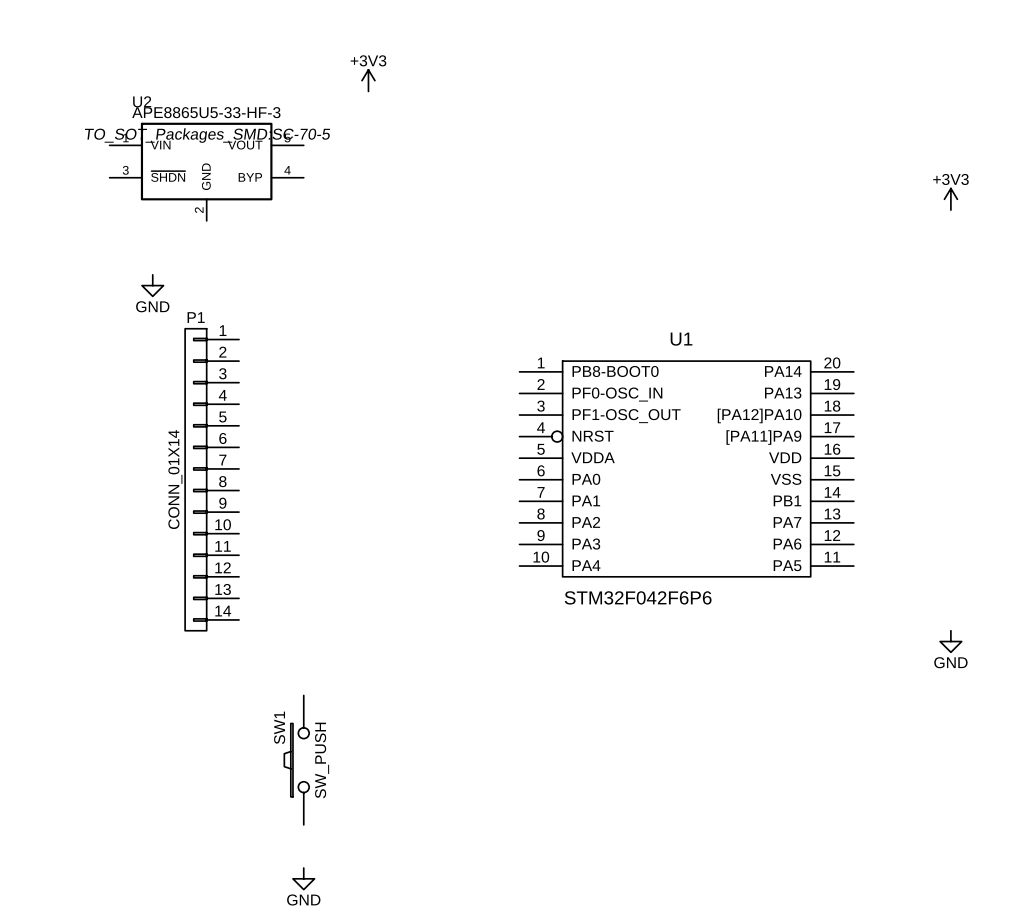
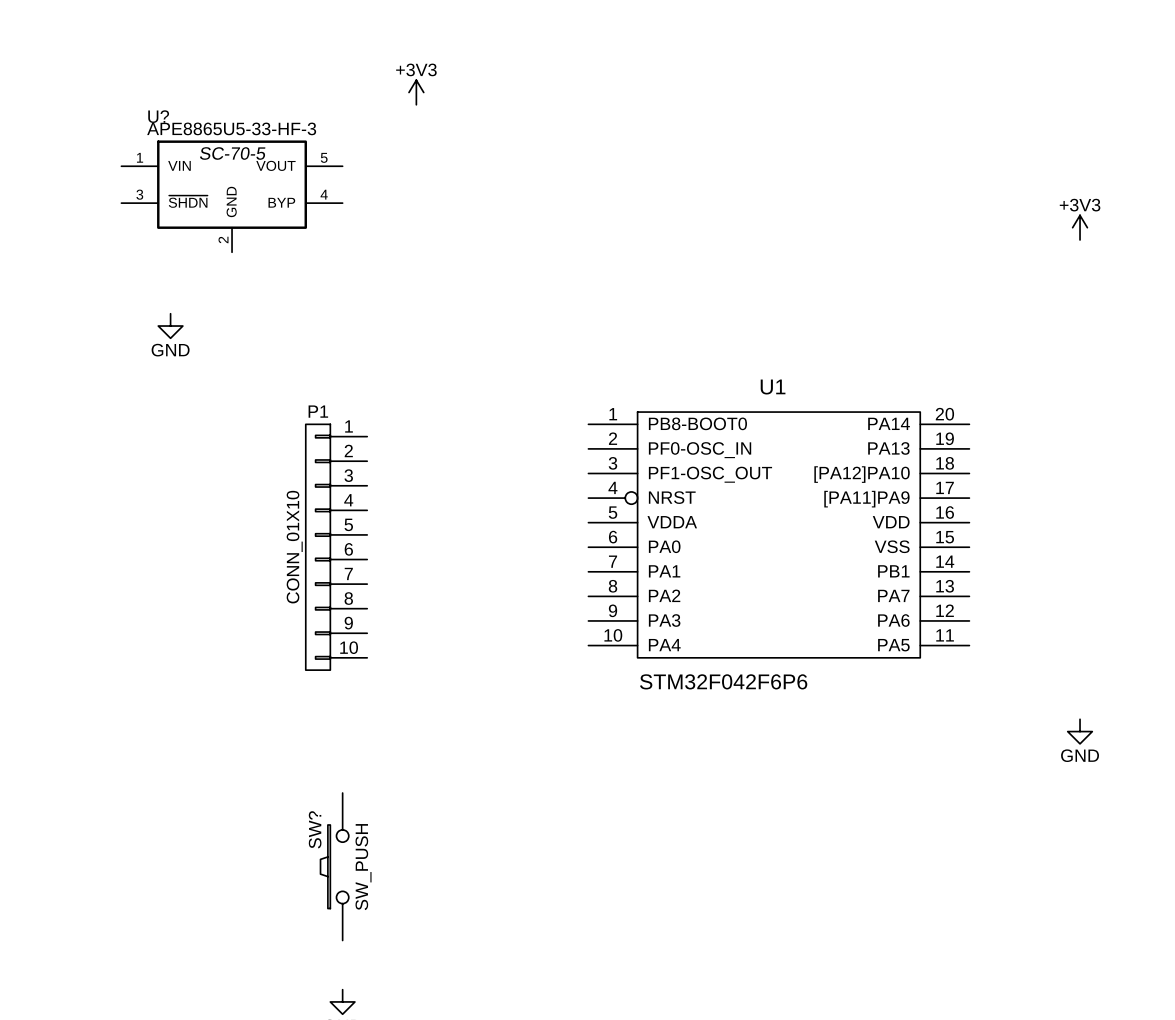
U2 name: U2 (142, 101) -> U? (158, 116)
U2 text: TO_SOT_Packages_SMD:SC-70-5 (207, 135) -> SC-70-5 (232, 153)
P1 name position: P1 (196, 317) -> P1 (318, 411)
P1 symbol: [185, 328, 240, 631] -> [305, 424, 368, 671]
P1 value: CONN_01X14 (175, 479) -> CONN_01X10 (294, 547)
SW1 name: SW1 (279, 727) -> SW? (315, 829)

